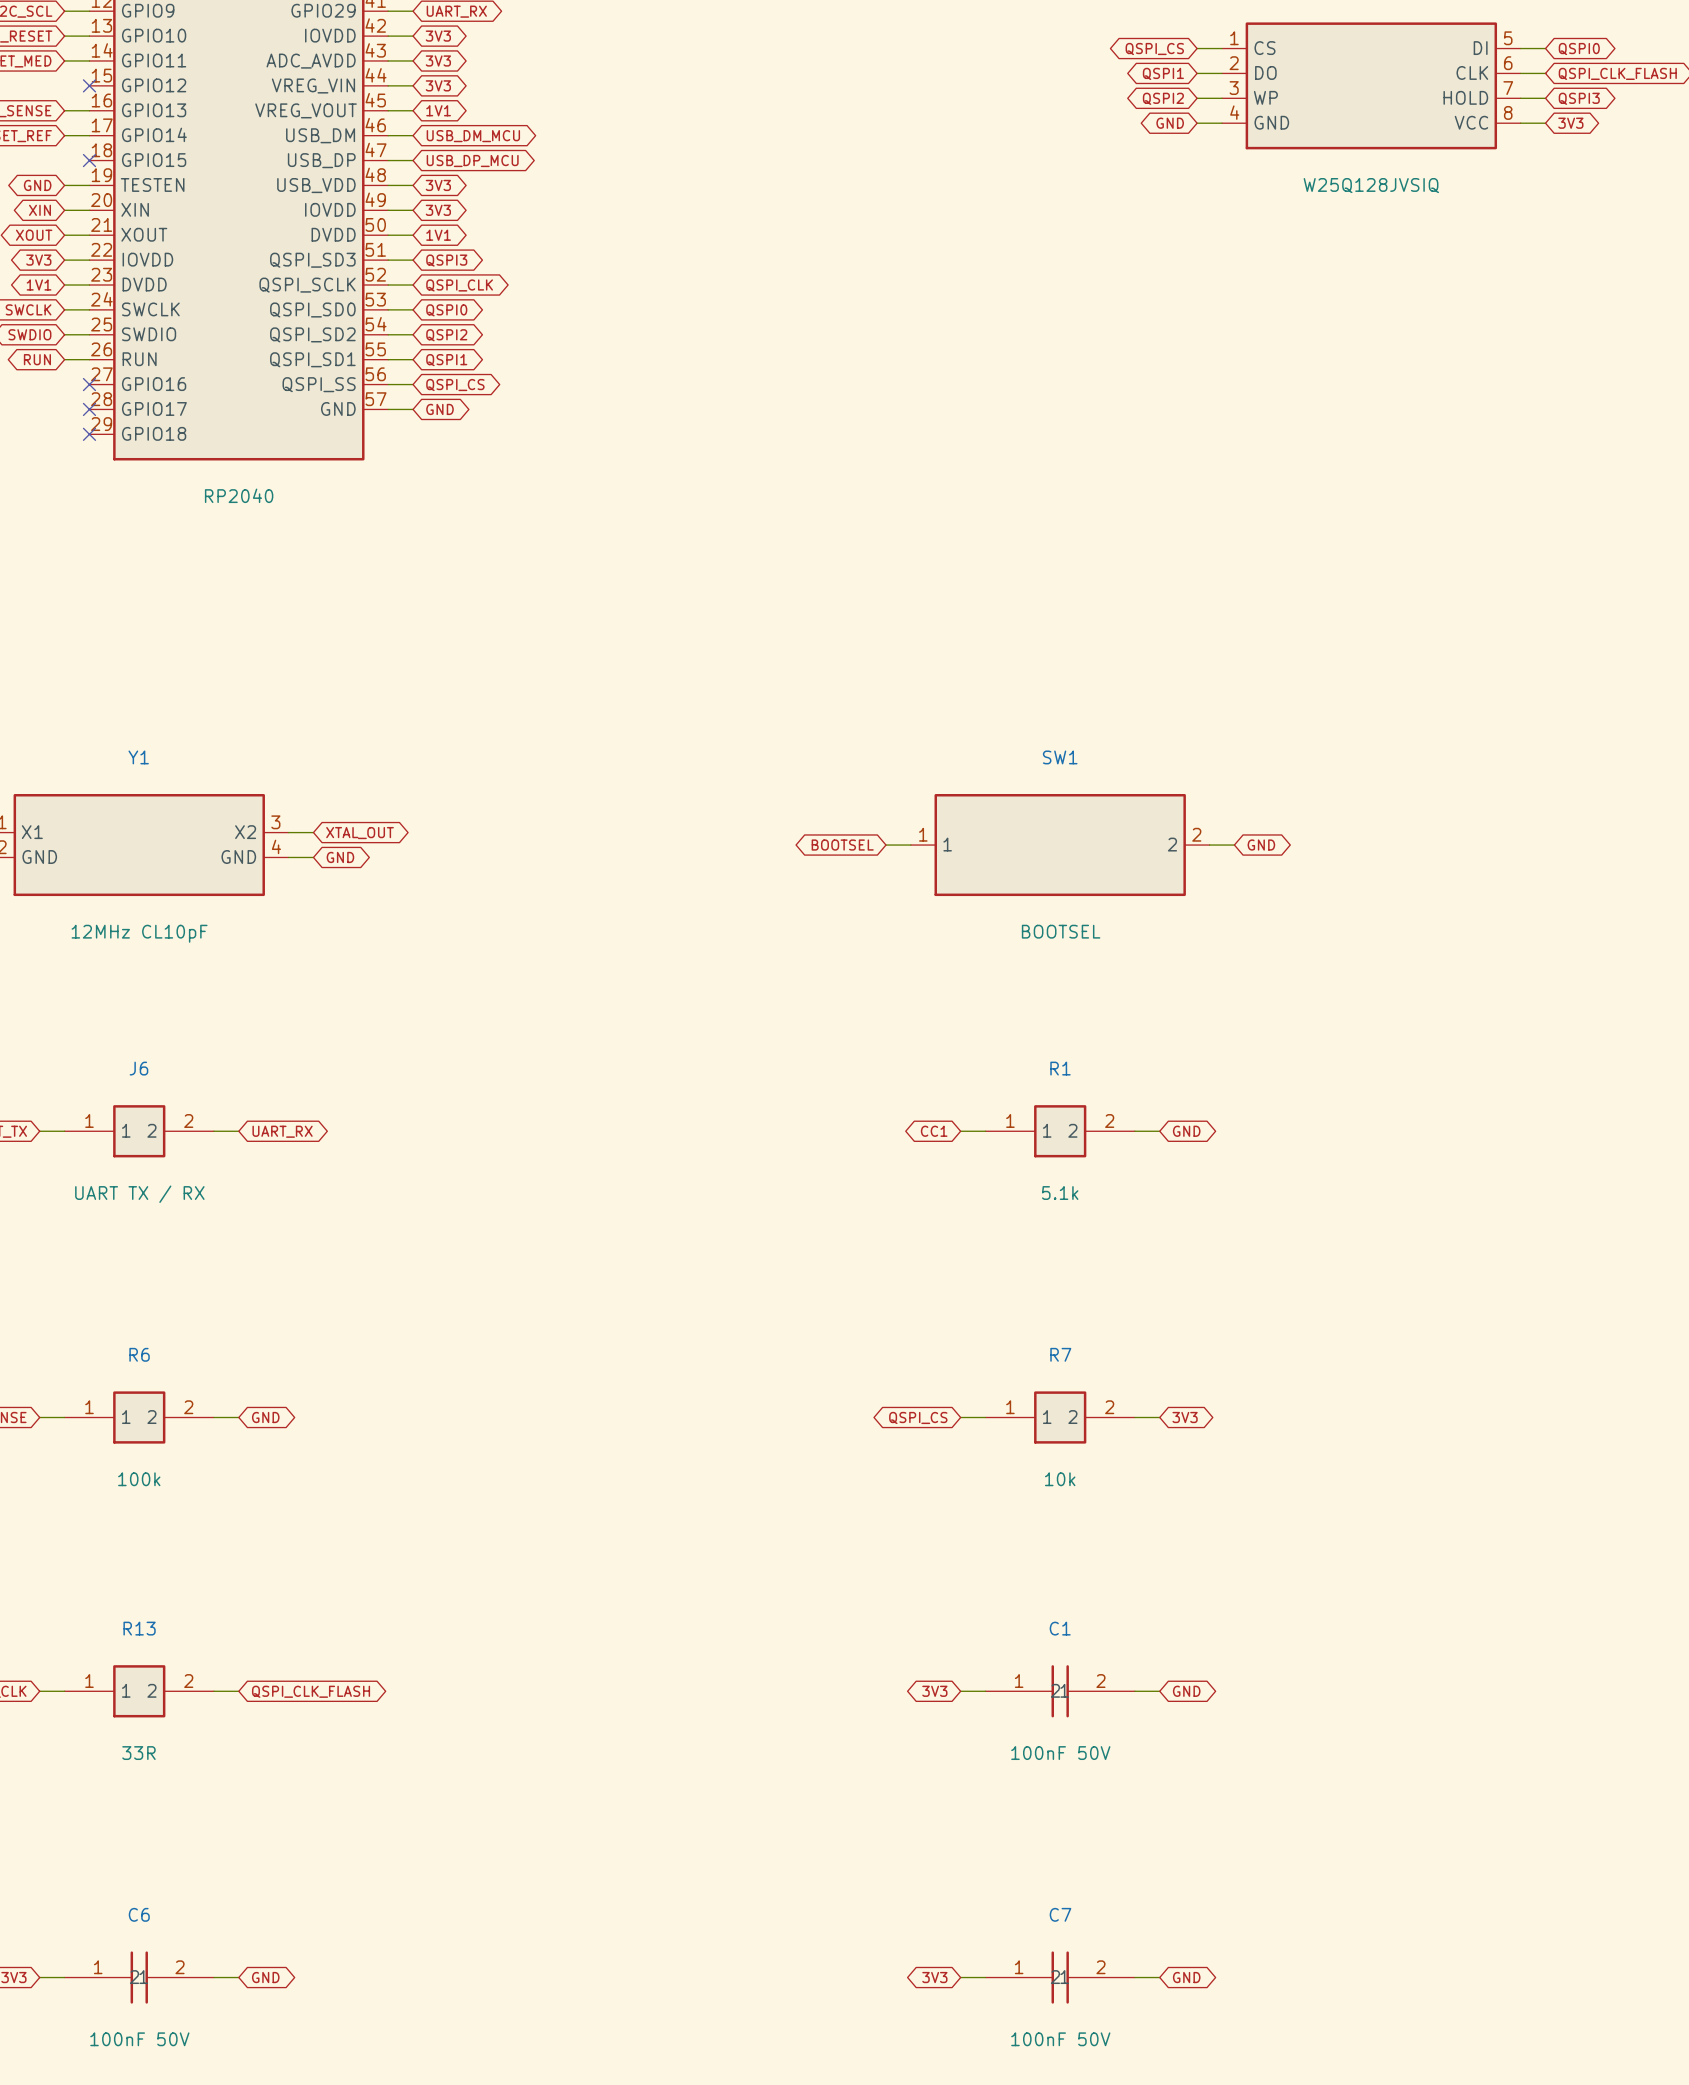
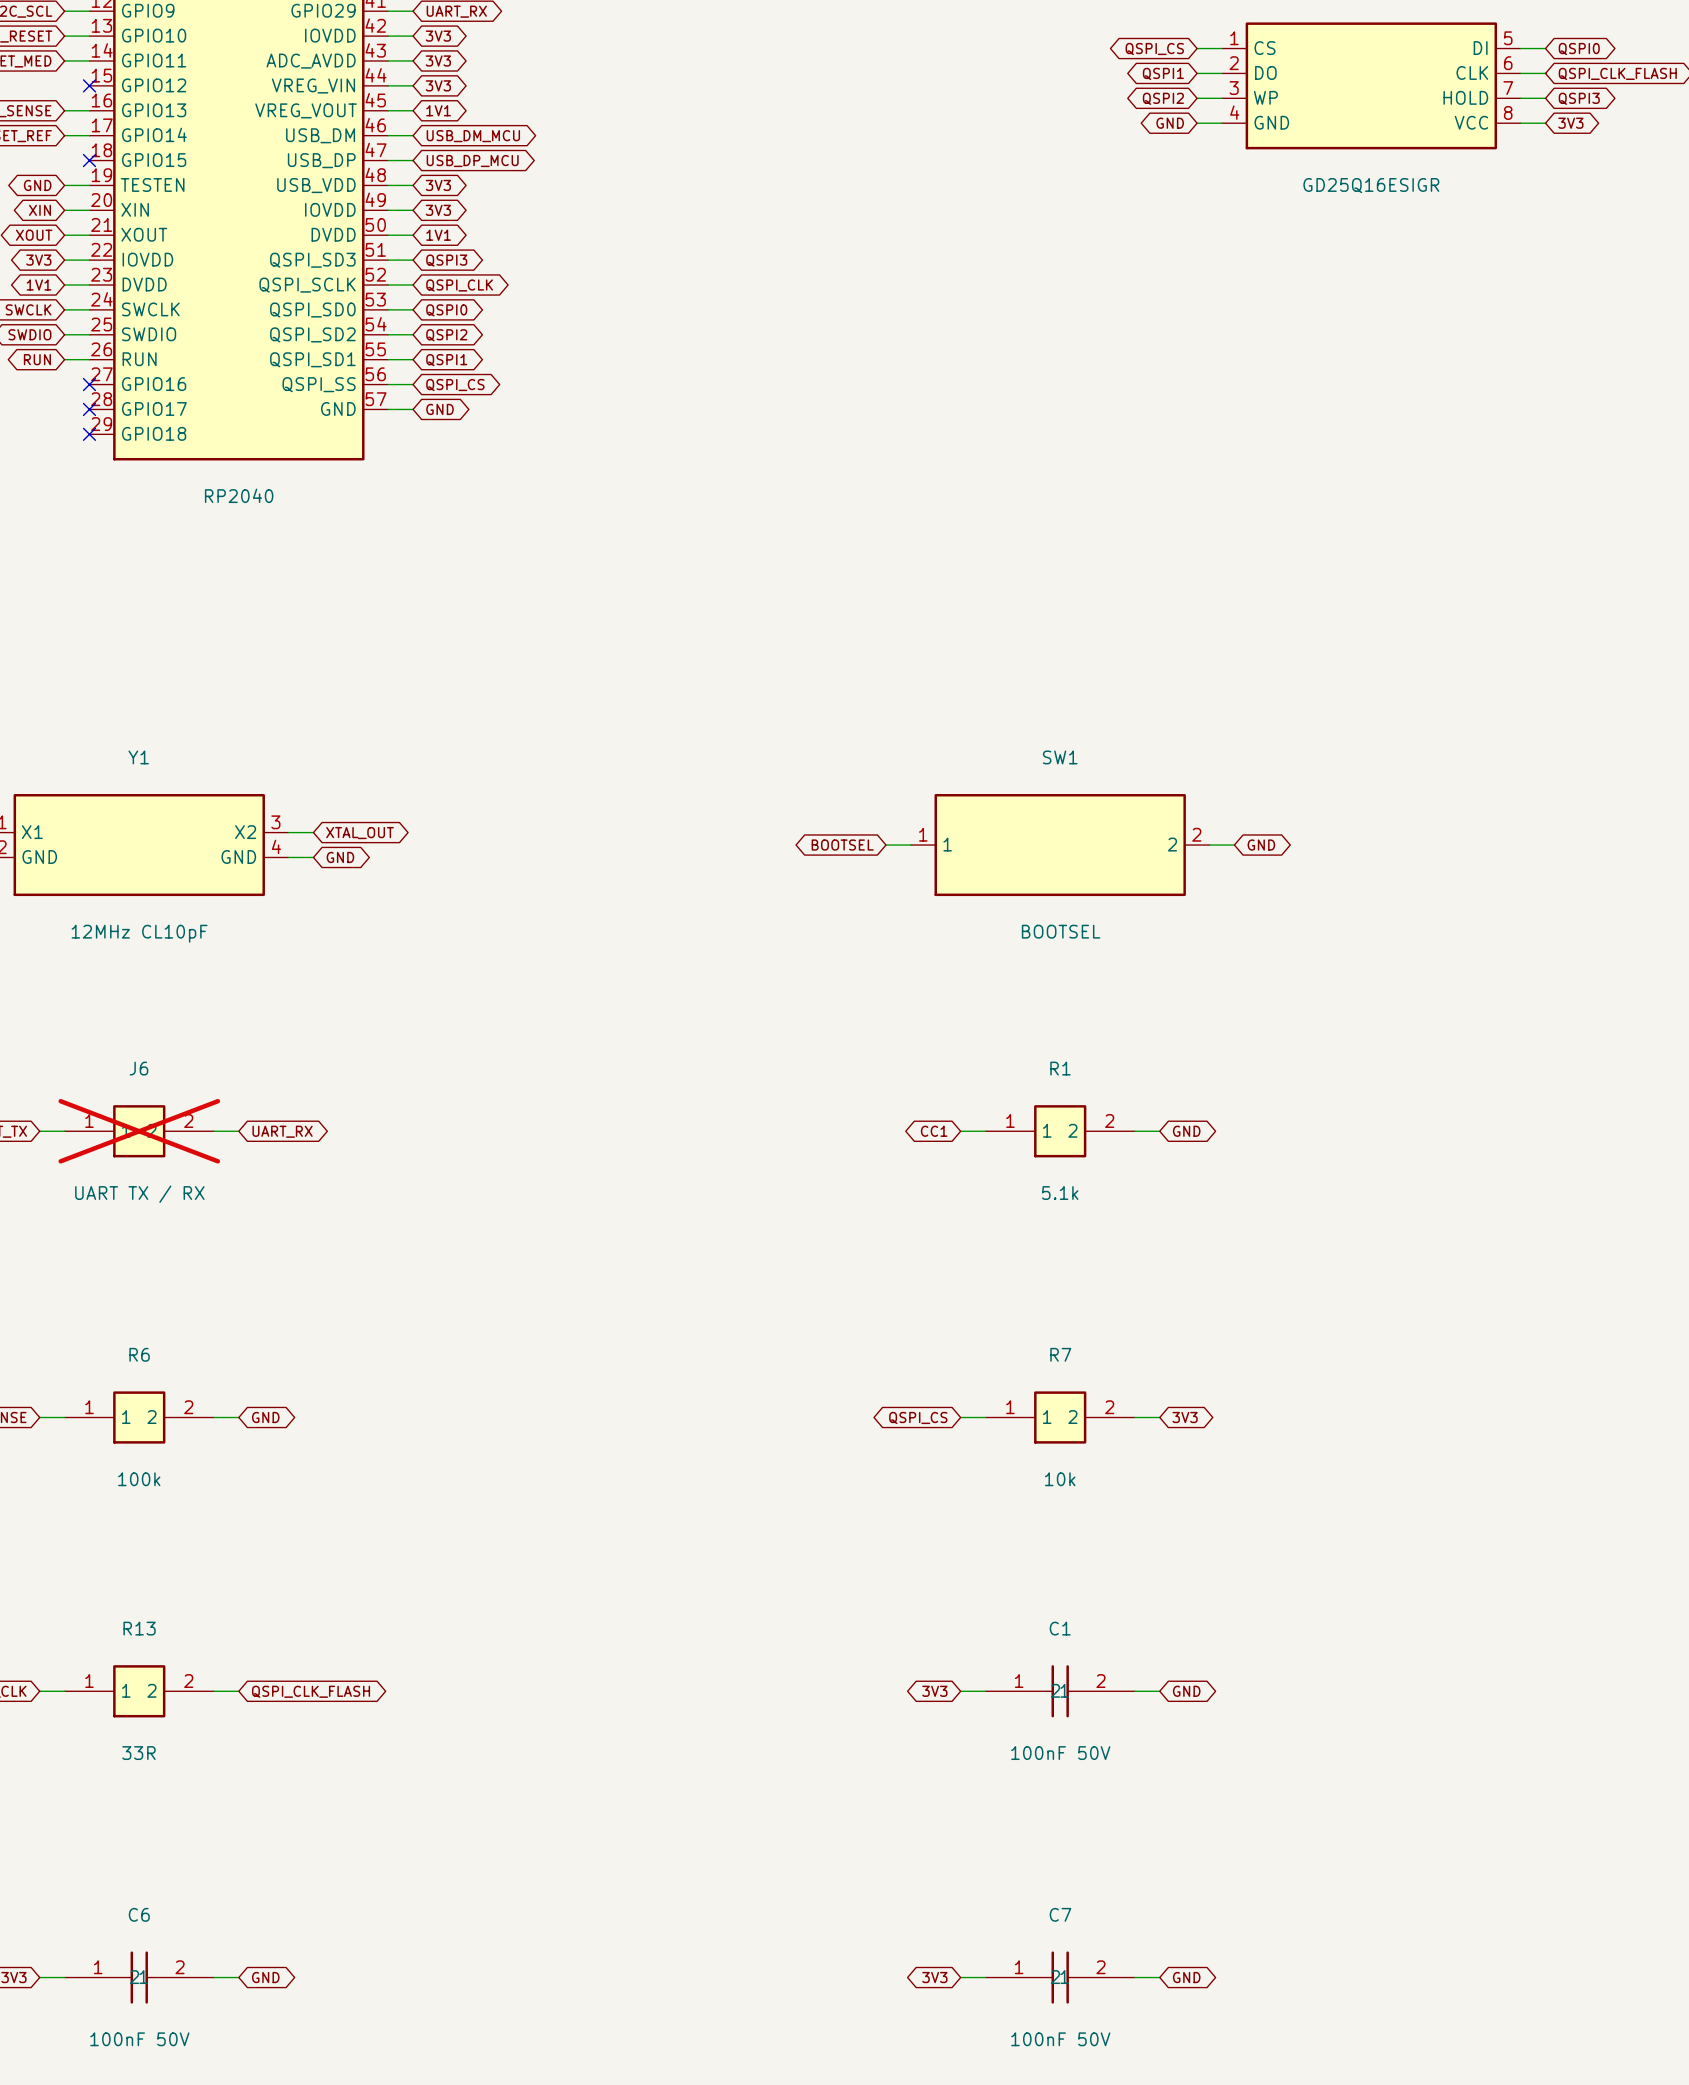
part value: W25Q128JVSIQ (1371, 185) -> GD25Q16ESIGR (1371, 185)
J6 do-not-place cross: none -> (139, 1131)

